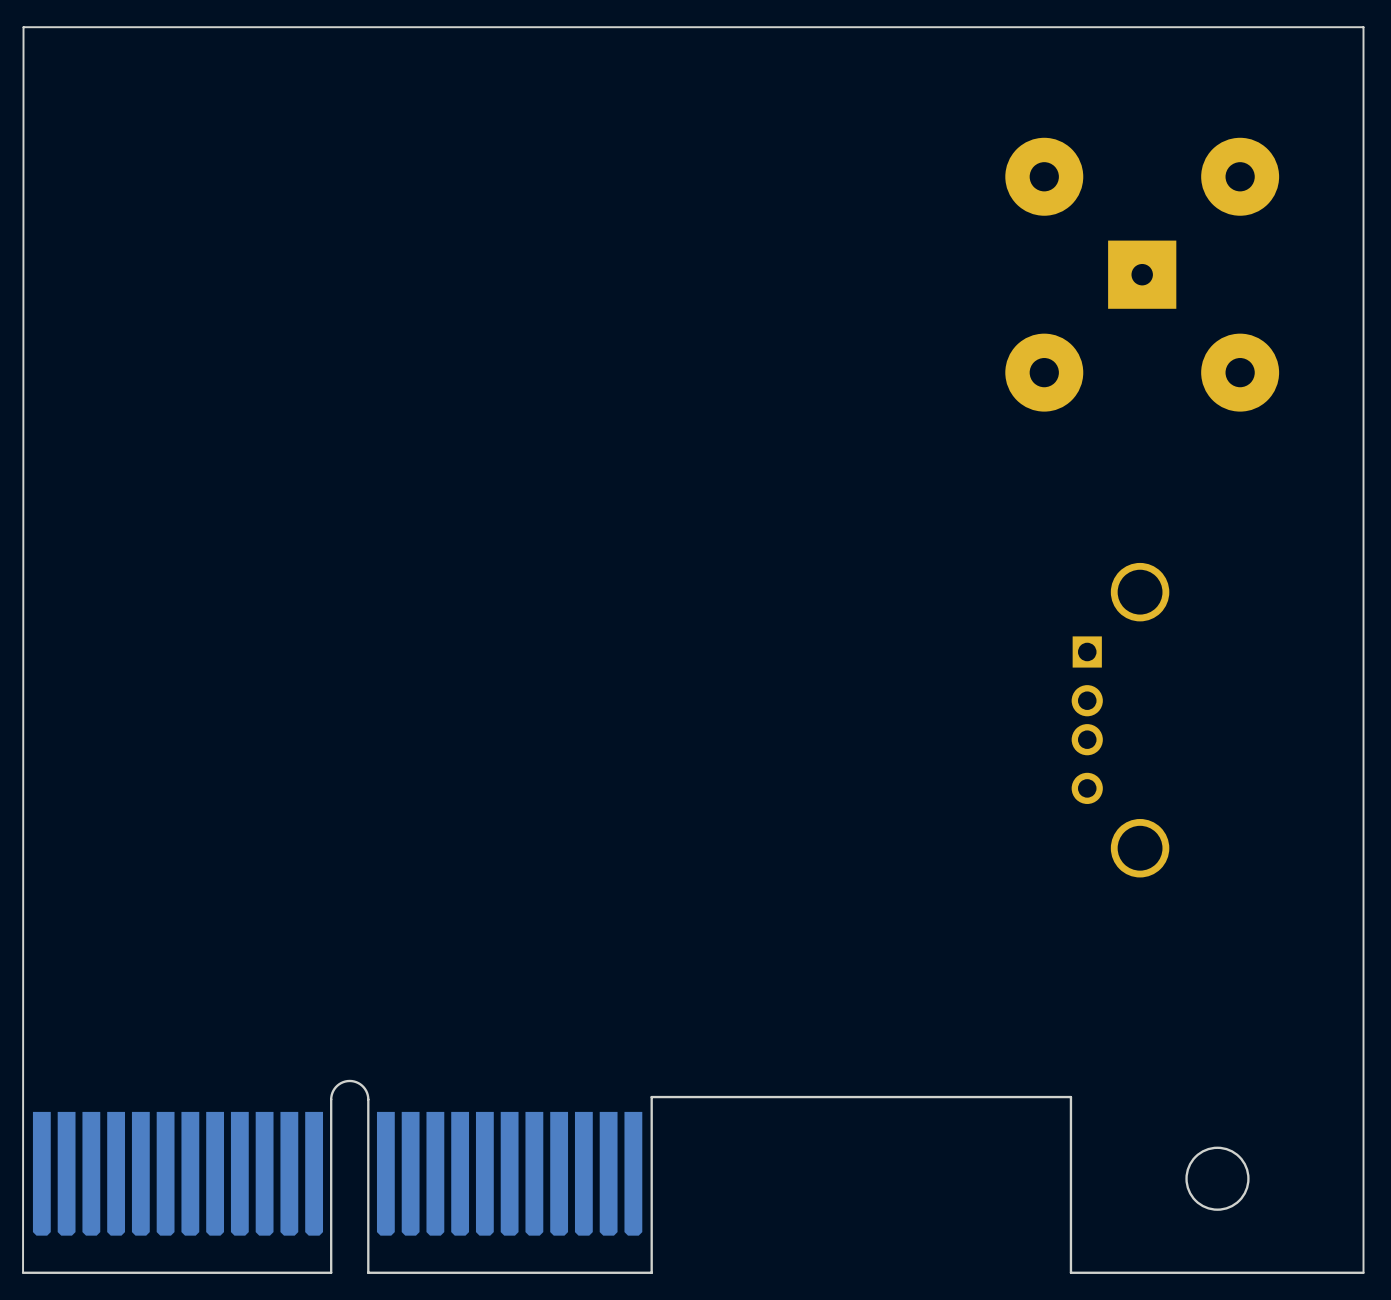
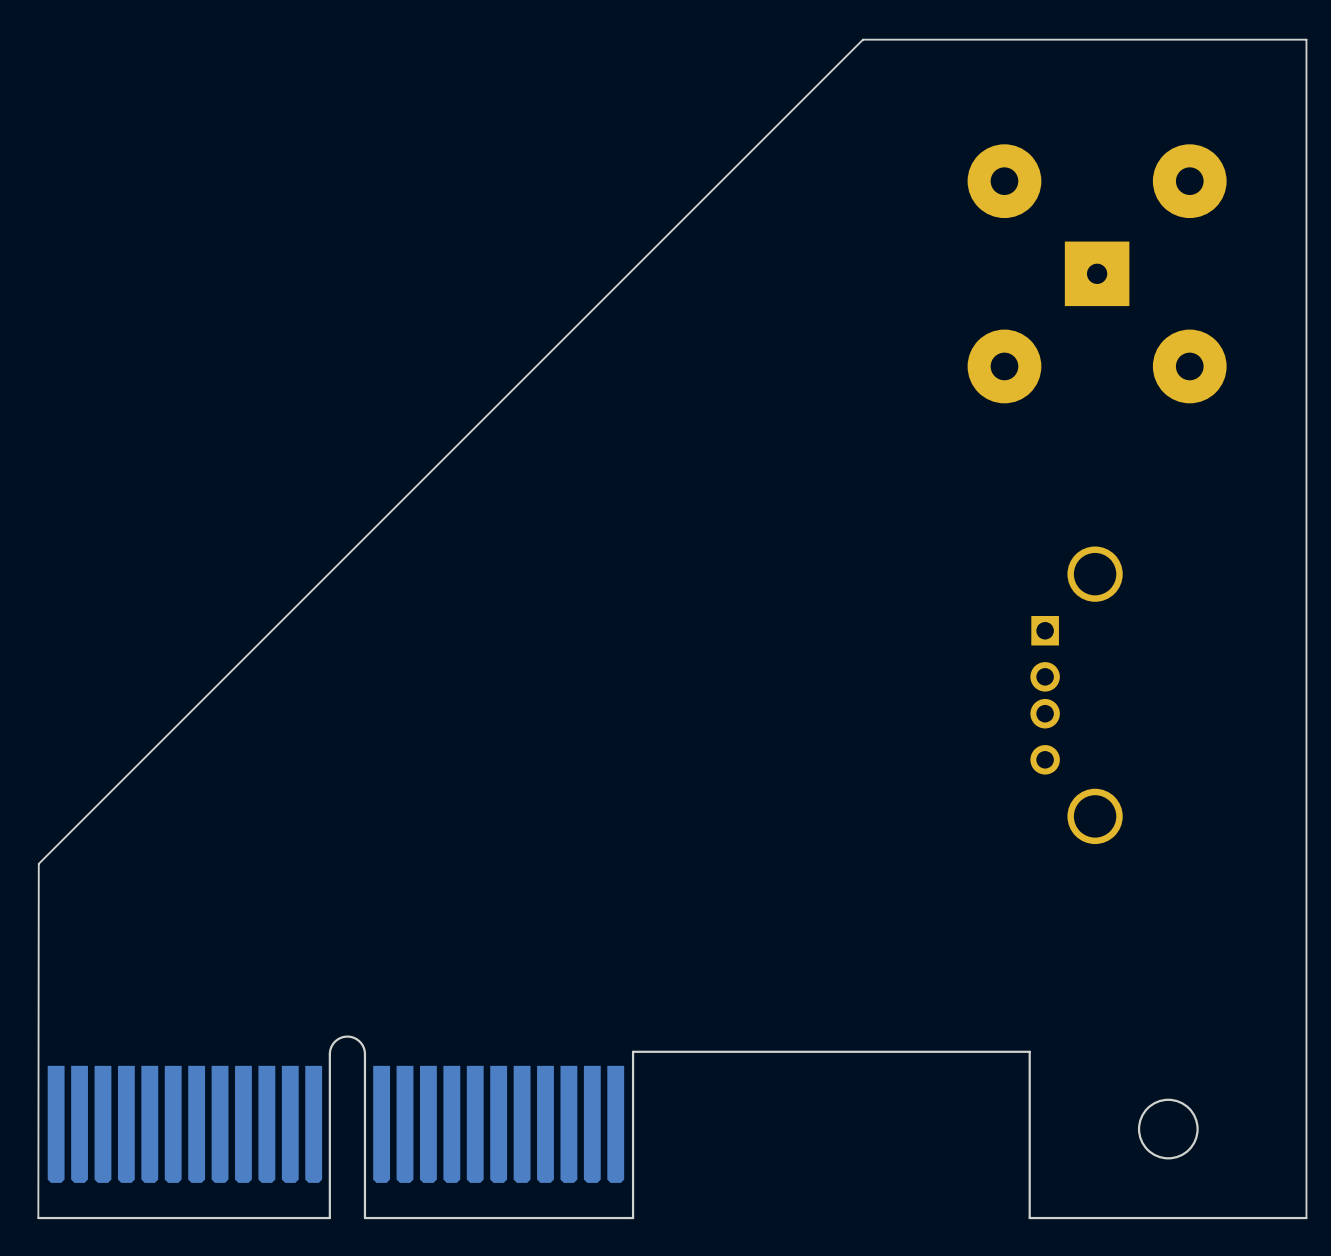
board edge: (894, 27) (23, 27) (23, 1272) -> (862, 39) (38, 863) (38, 1218)

